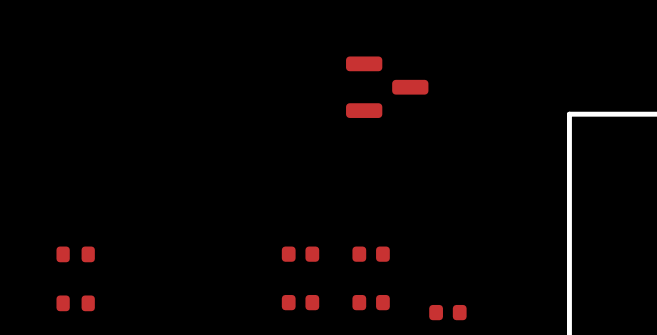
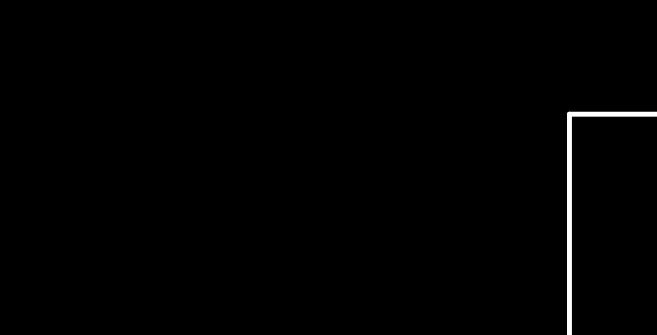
part: (387, 87) -> none
part: (75, 254) -> none
part: (300, 254) -> none
part: (371, 254) -> none
part: (300, 302) -> none
part: (371, 302) -> none
part: (75, 303) -> none
part: (447, 312) -> none

